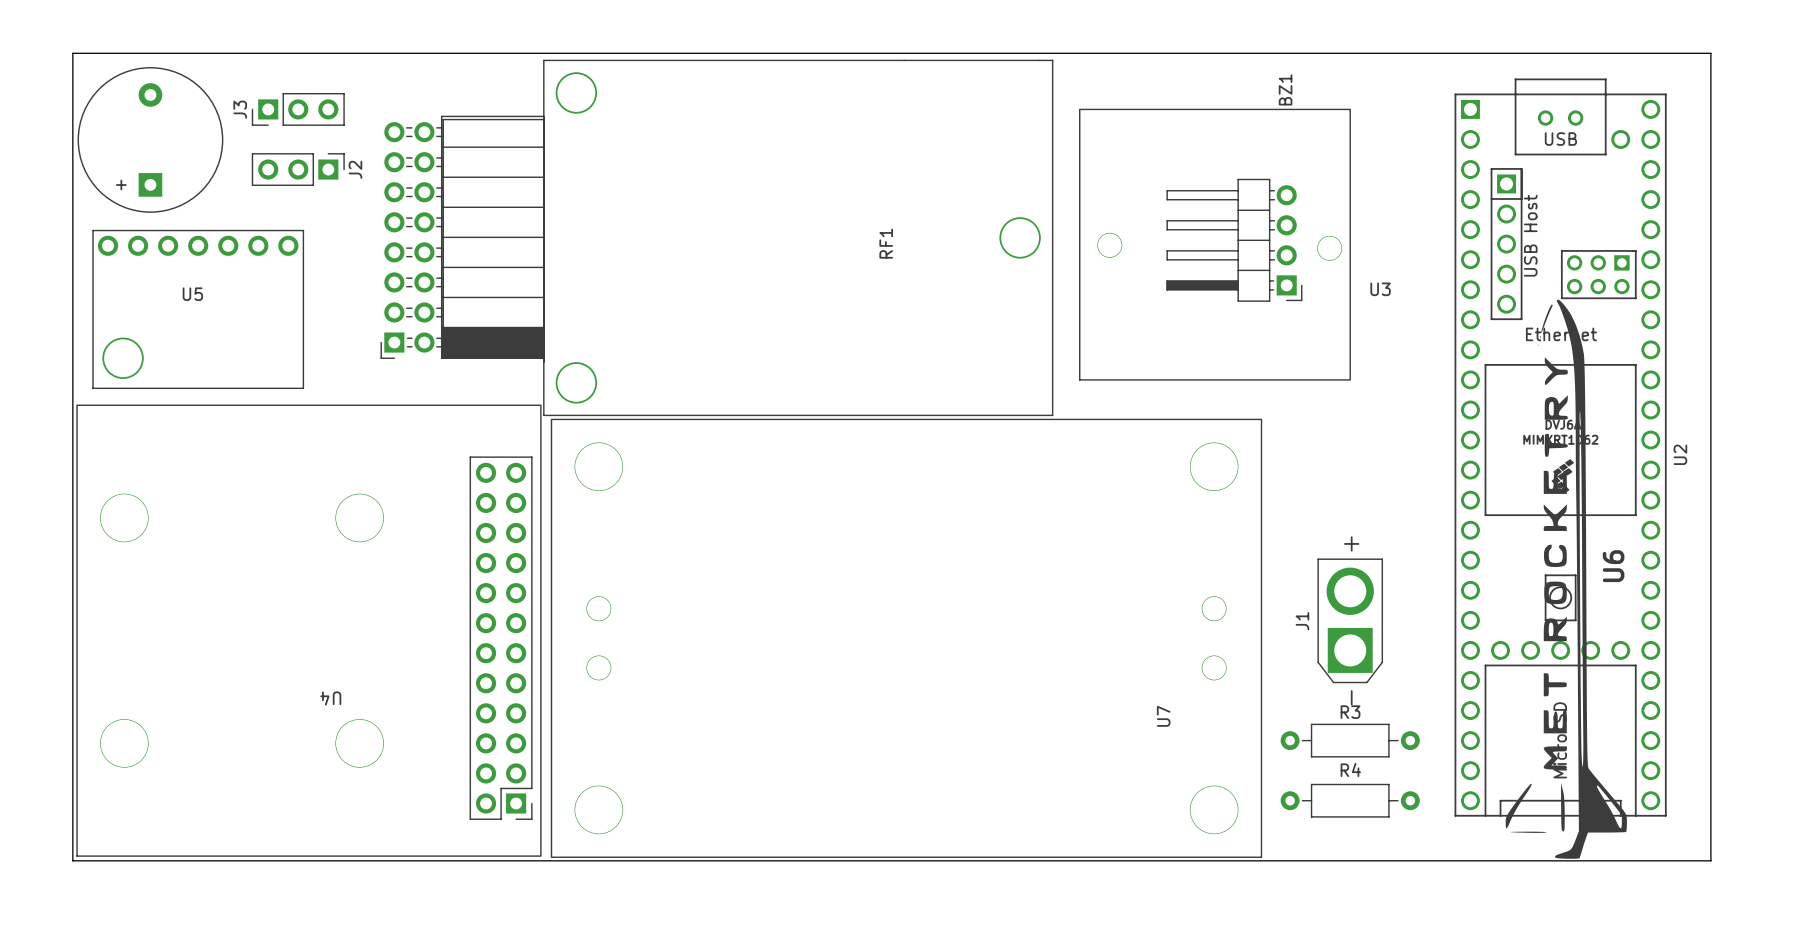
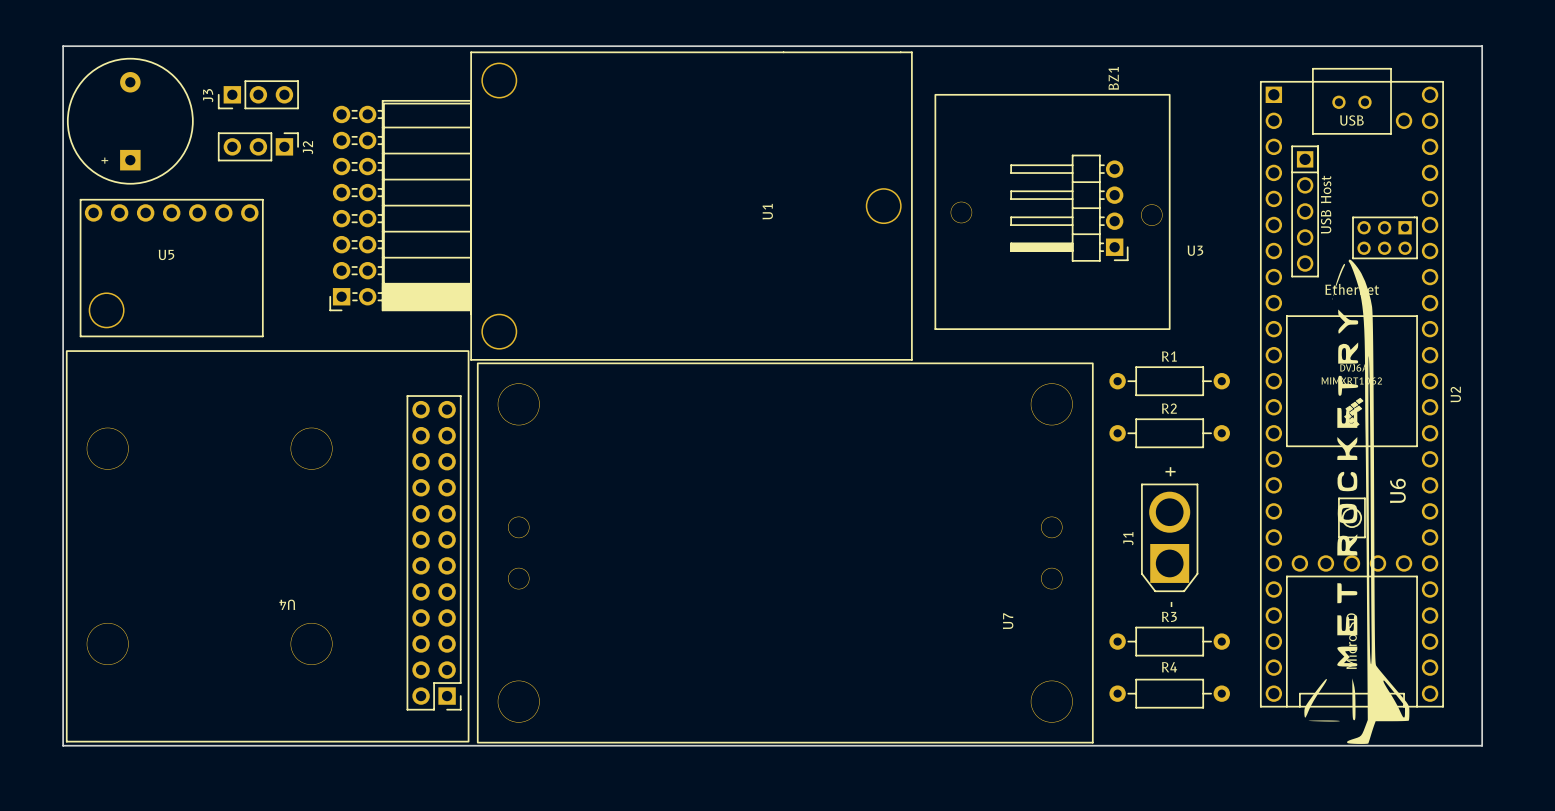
RF1 name: RF1 (886, 243) -> U1 (767, 211)
R1: none -> (1169, 381)
R2: none -> (1169, 433)

